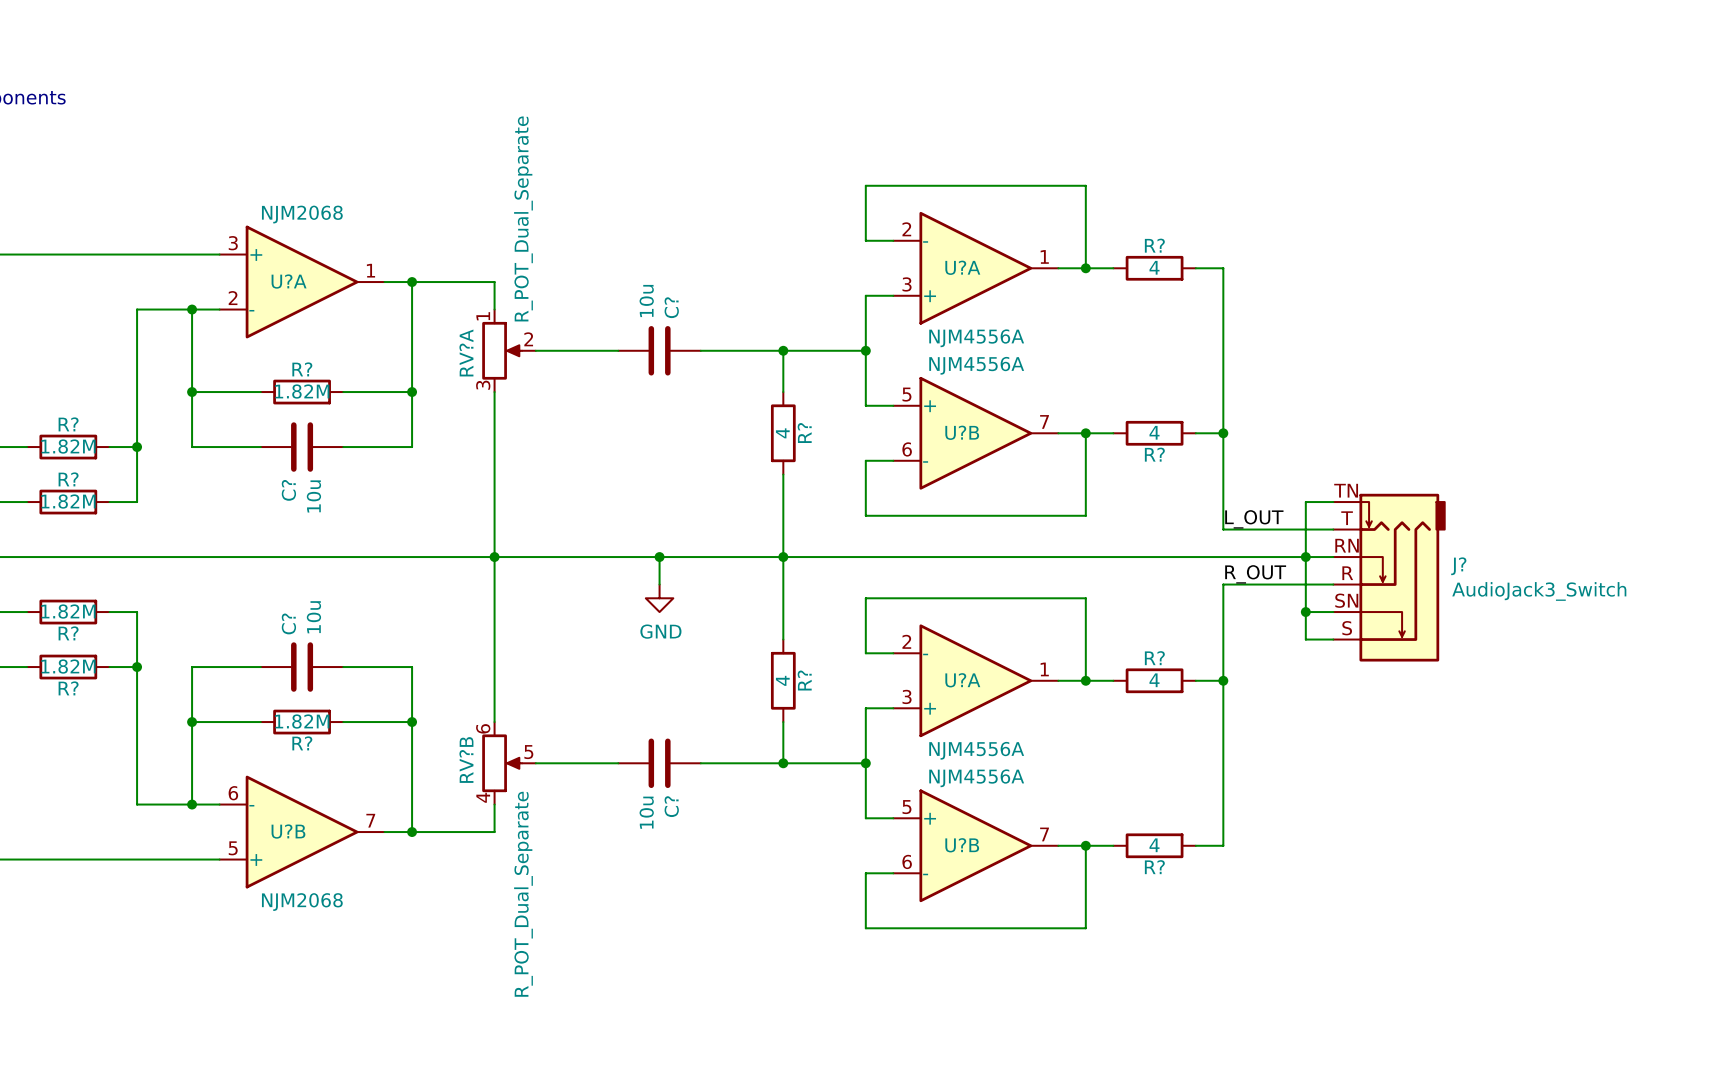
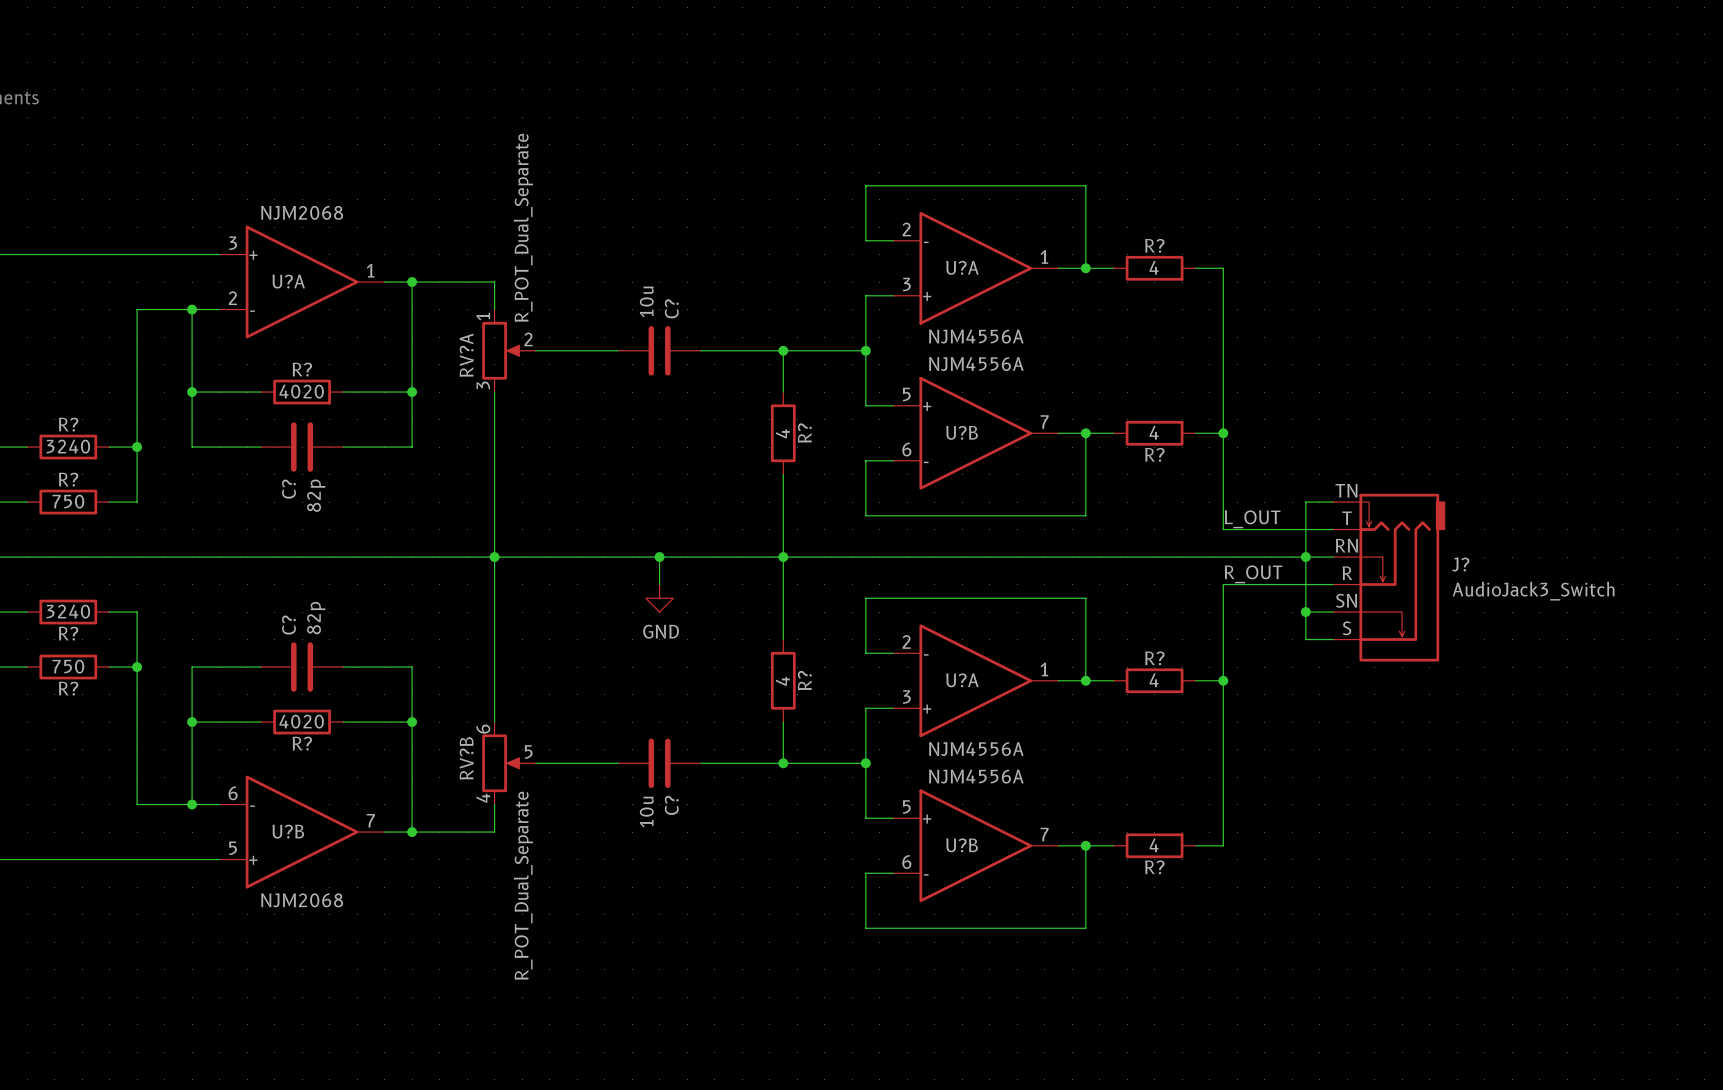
R? value: 1.82M (302, 391) -> 4020 (301, 391)
R? value: 1.82M (68, 446) -> 3240 (68, 446)
C? value: 10u (313, 496) -> 82p (316, 495)
R? value: 1.82M (68, 501) -> 750 (68, 501)
R? value: 1.82M (68, 611) -> 3240 (68, 611)
C? value: 10u (313, 617) -> 82p (316, 618)
R? value: 1.82M (68, 666) -> 750 (68, 666)
R? value: 1.82M (302, 721) -> 4020 (301, 721)

